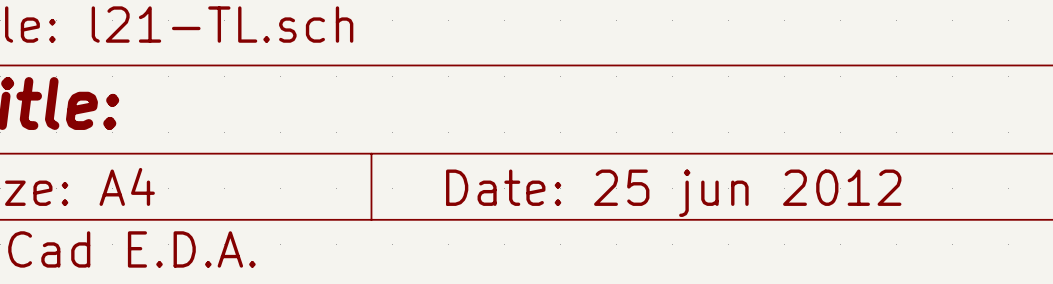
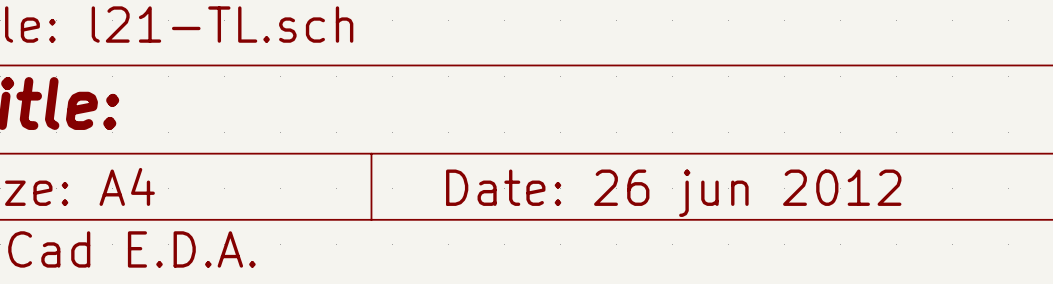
title block: Date: 25 jun 2012 (673, 193) -> Date: 26 jun 2012 (673, 193)

